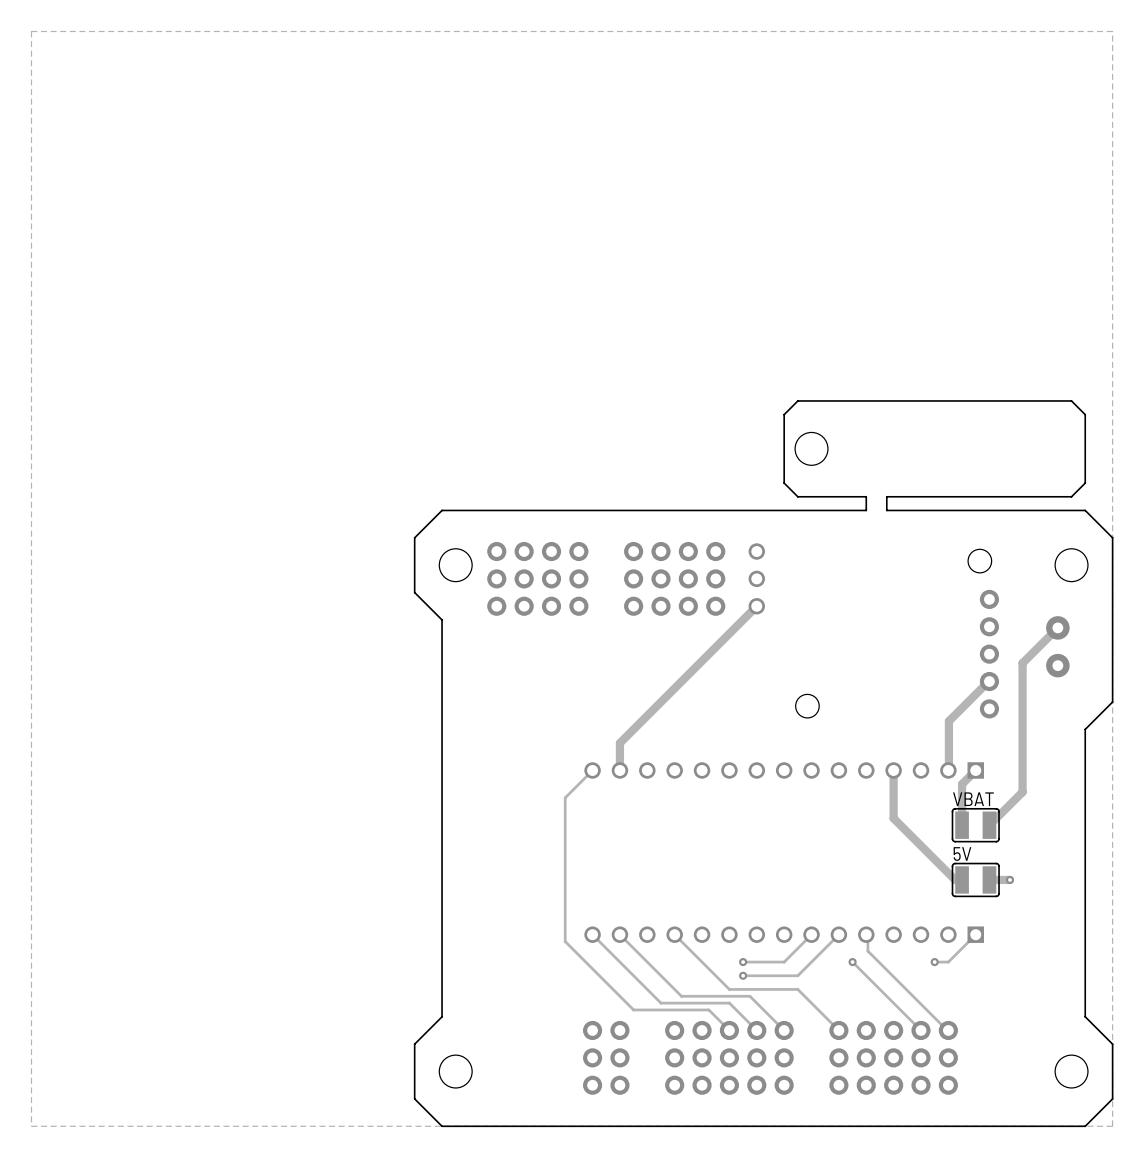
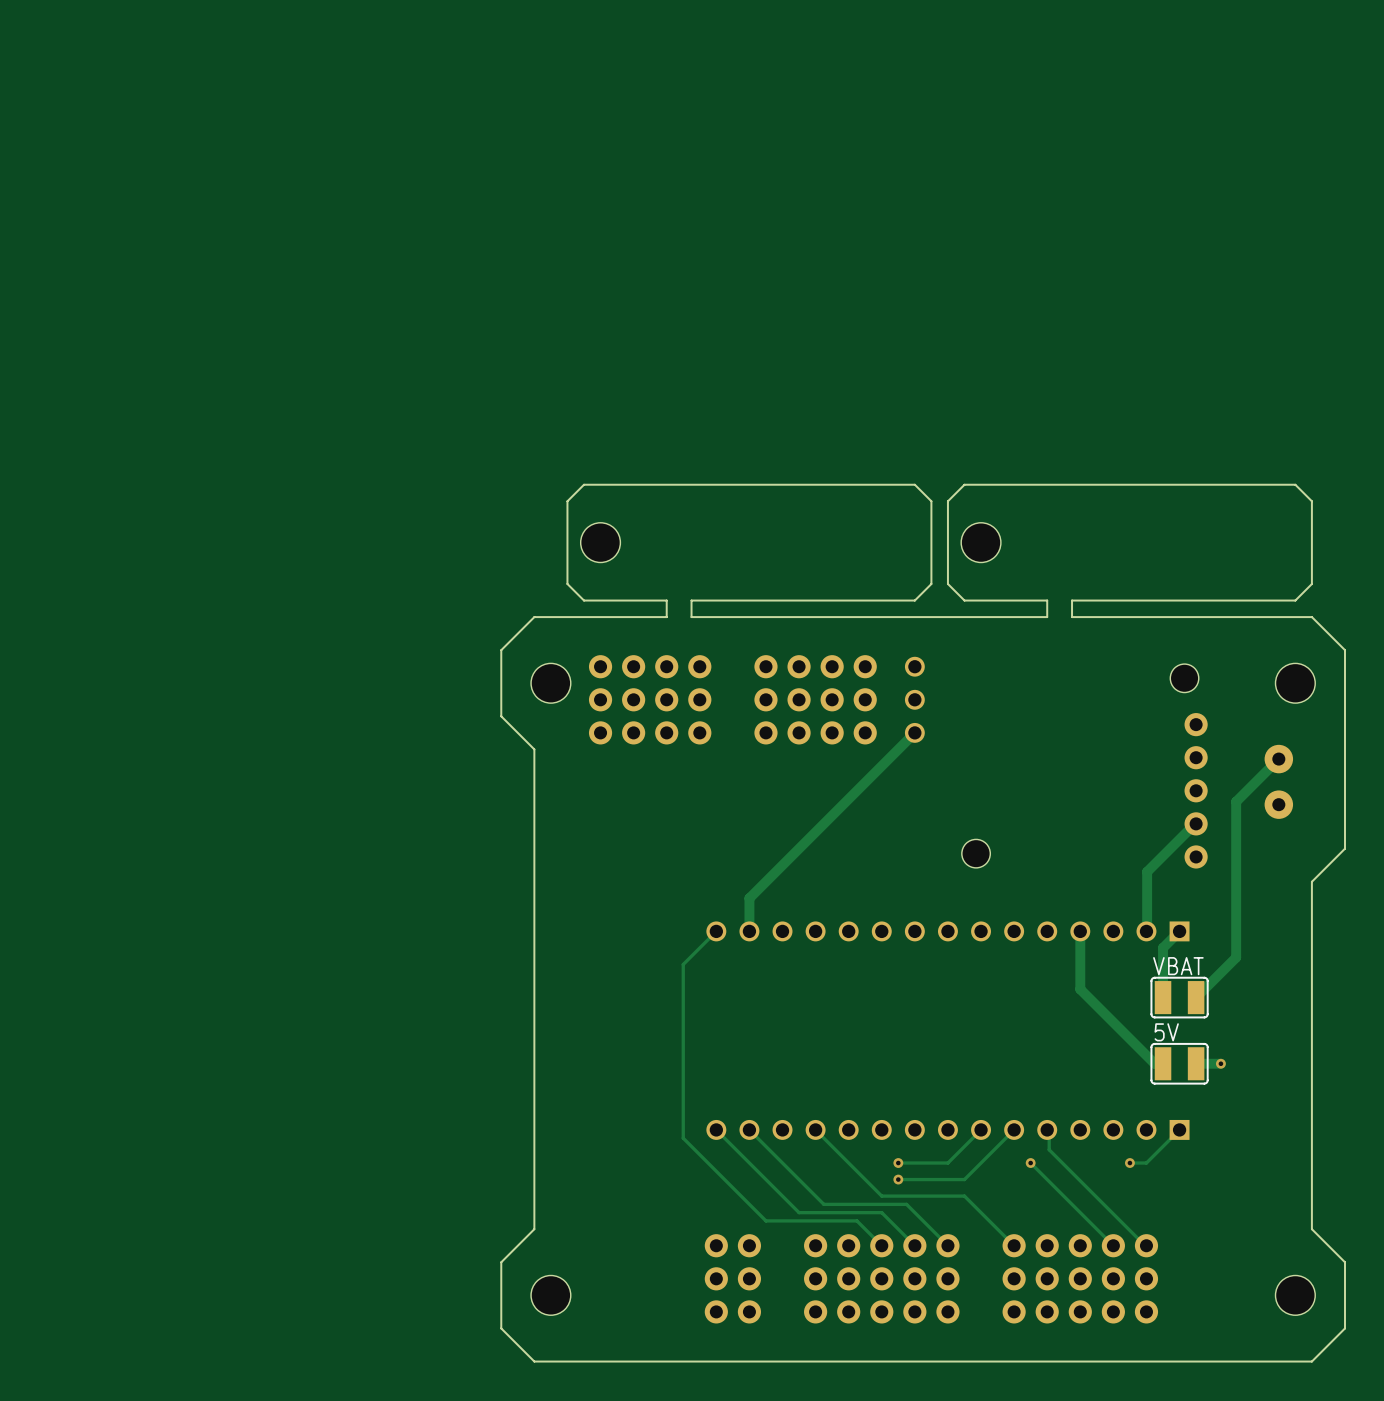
zone outline: (1112, 31) (31, 31) (31, 1126) (1112, 1126) (1112, 31) -> none
hole: none -> (600, 542)
board edge: (572, 510) (551, 510) -> (691, 617) (691, 600) (914, 600) (931, 584) (931, 501) (914, 484) (584, 484) (567, 501) (567, 584) (584, 600) (666, 600) (666, 617)

